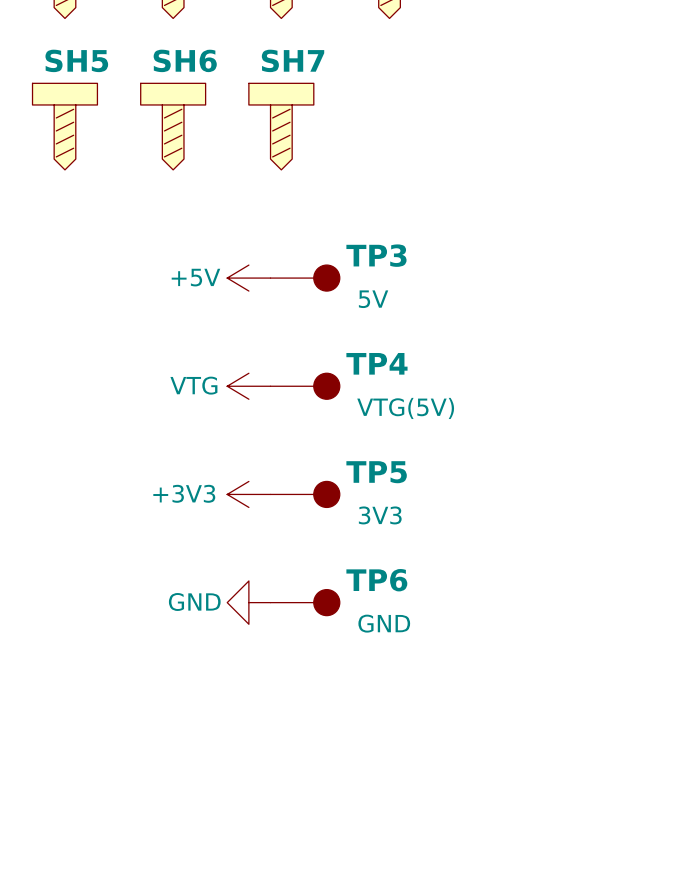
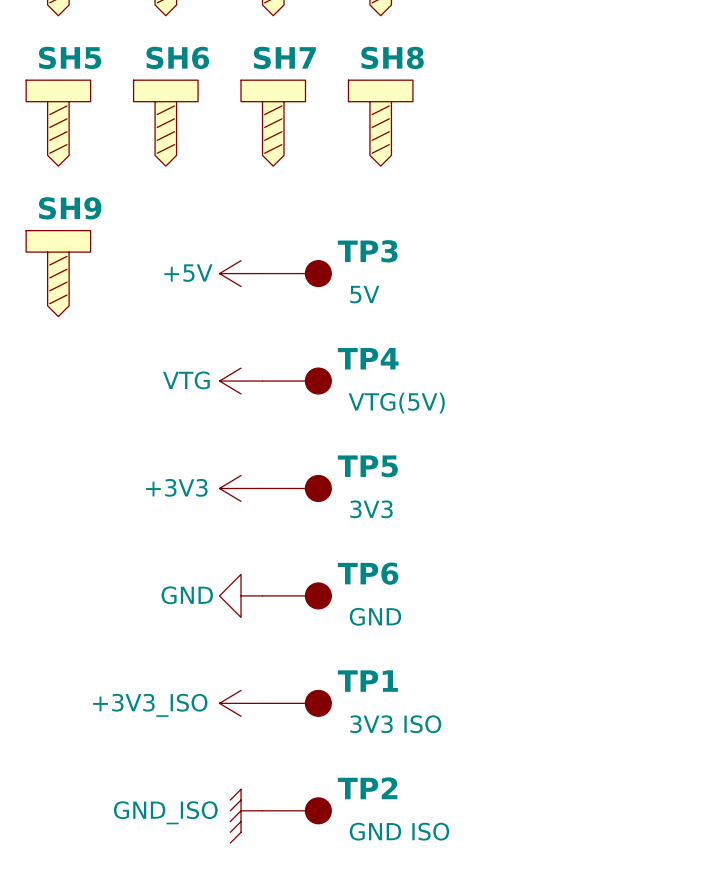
SH8: none -> (380, 123)
SH9: none -> (58, 273)
power symbol: none -> +3V3_ISO (241, 703)
TP1: none -> 3V3 ISO (296, 703)
TP2: none -> GND ISO (296, 810)
power symbol: none -> GND_ISO (246, 816)

